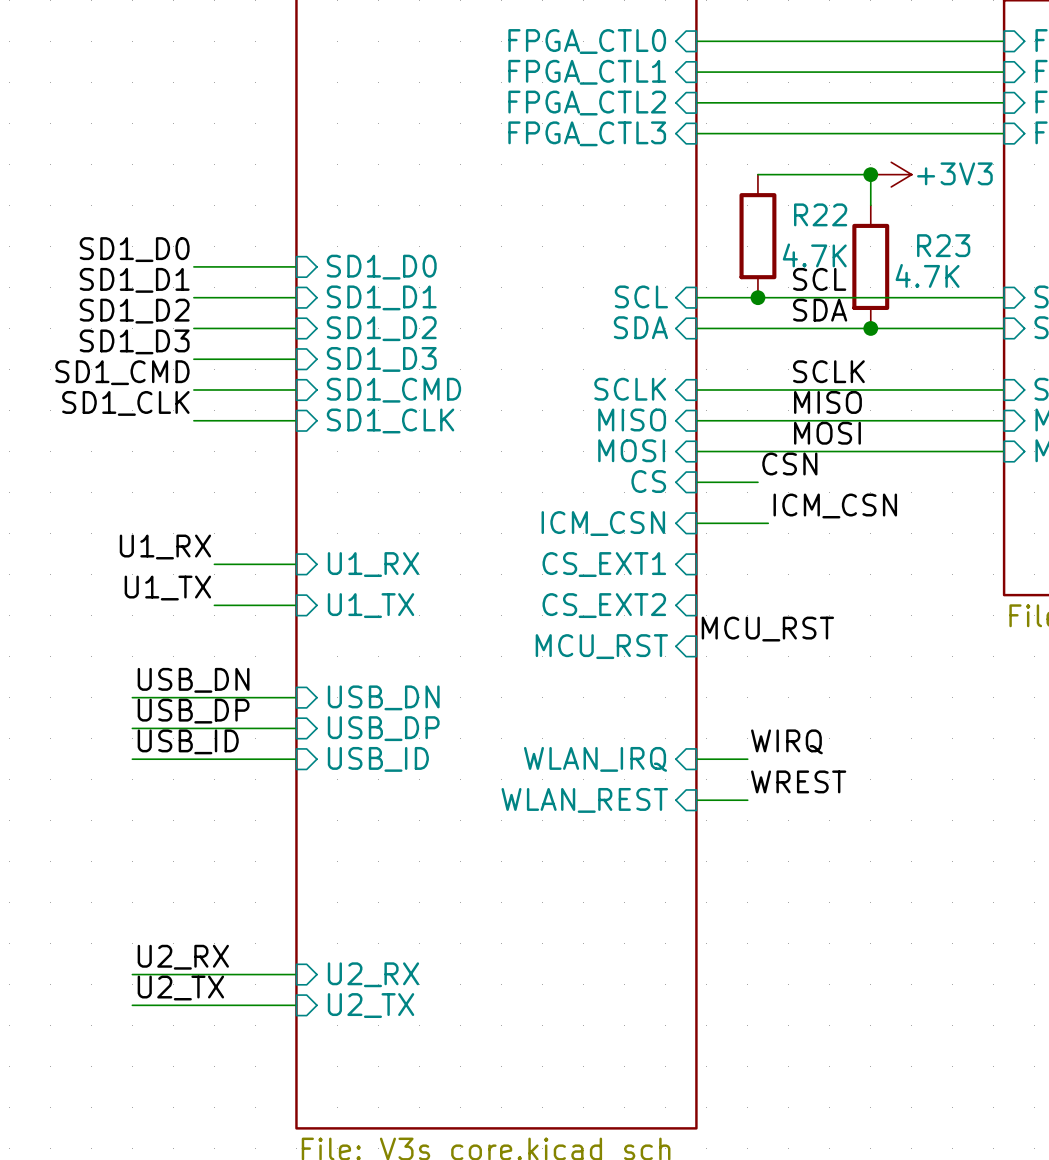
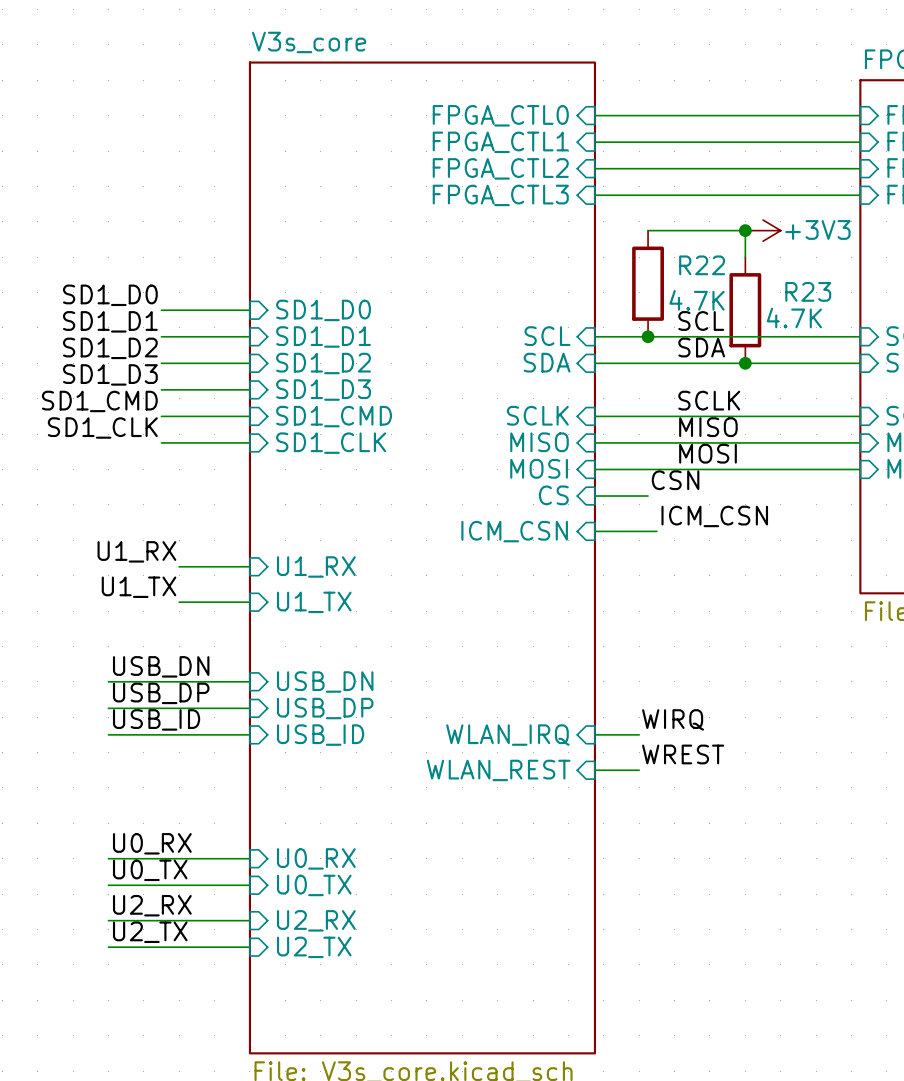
sheet pin: CS_EXT1 (604, 564) -> none
sheet pin: CS_EXT2 (604, 605) -> none
label: MCU_RST (767, 629) -> none
sheet pin: MCU_RST (601, 646) -> none
label: none -> U0_RX (152, 843)
wire: none -> (108, 858) (249, 858)
sheet pin: none -> U0_RX (316, 858)
label: none -> U0_TX (150, 870)
wire: none -> (108, 885) (249, 885)
sheet pin: none -> U0_TX (314, 885)

